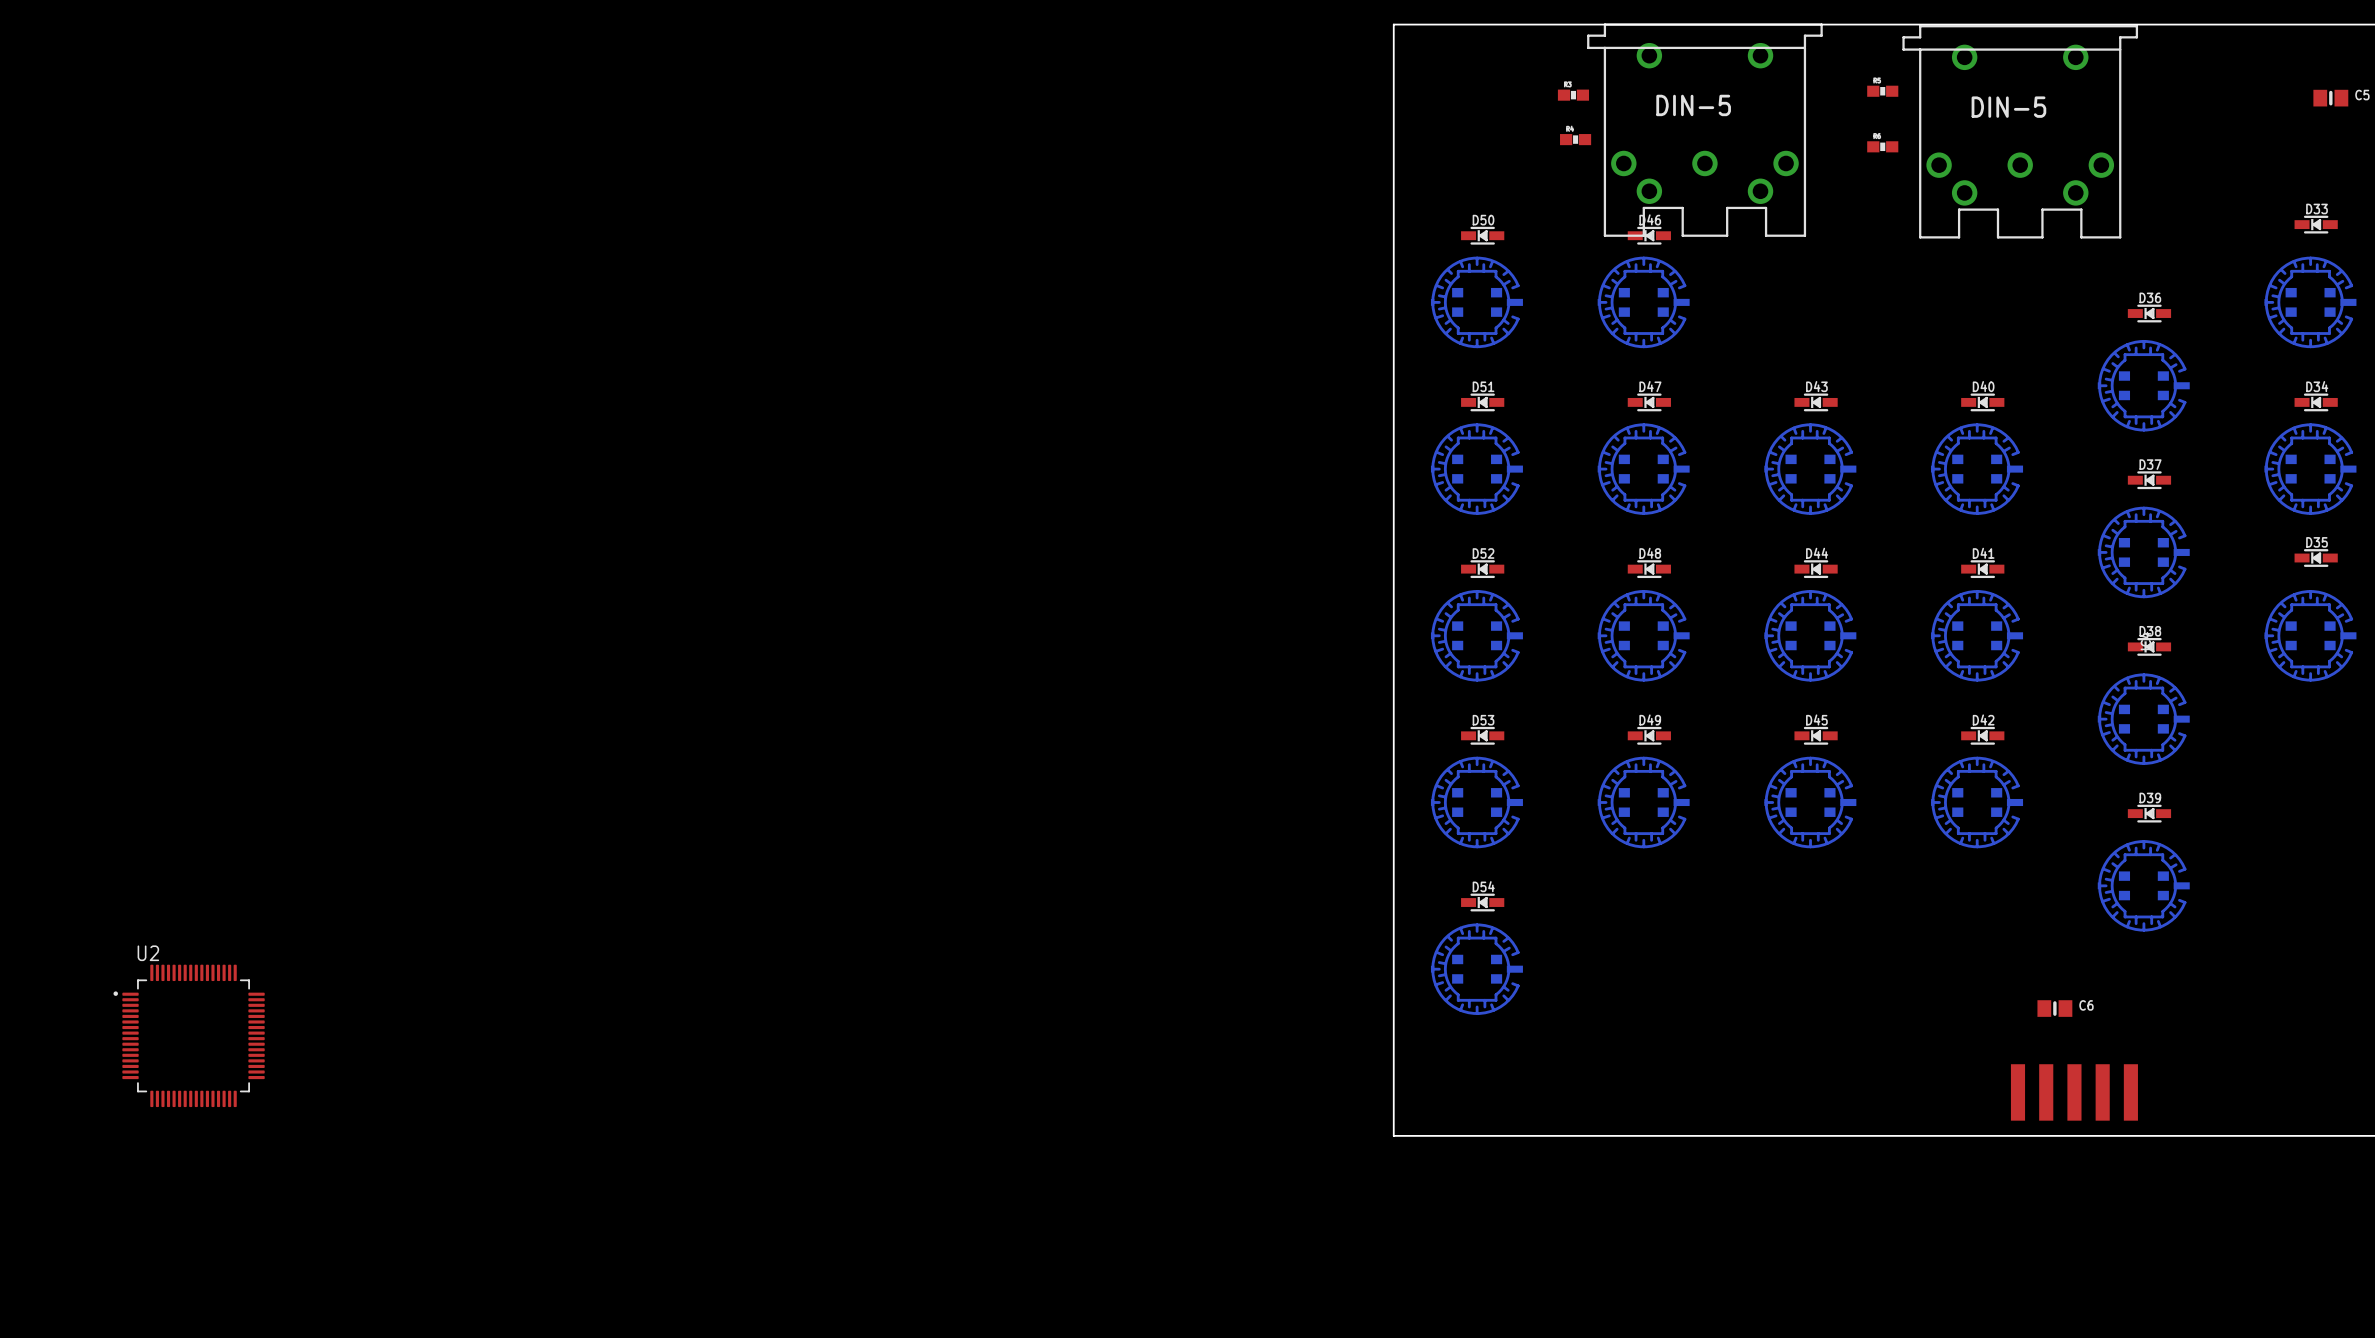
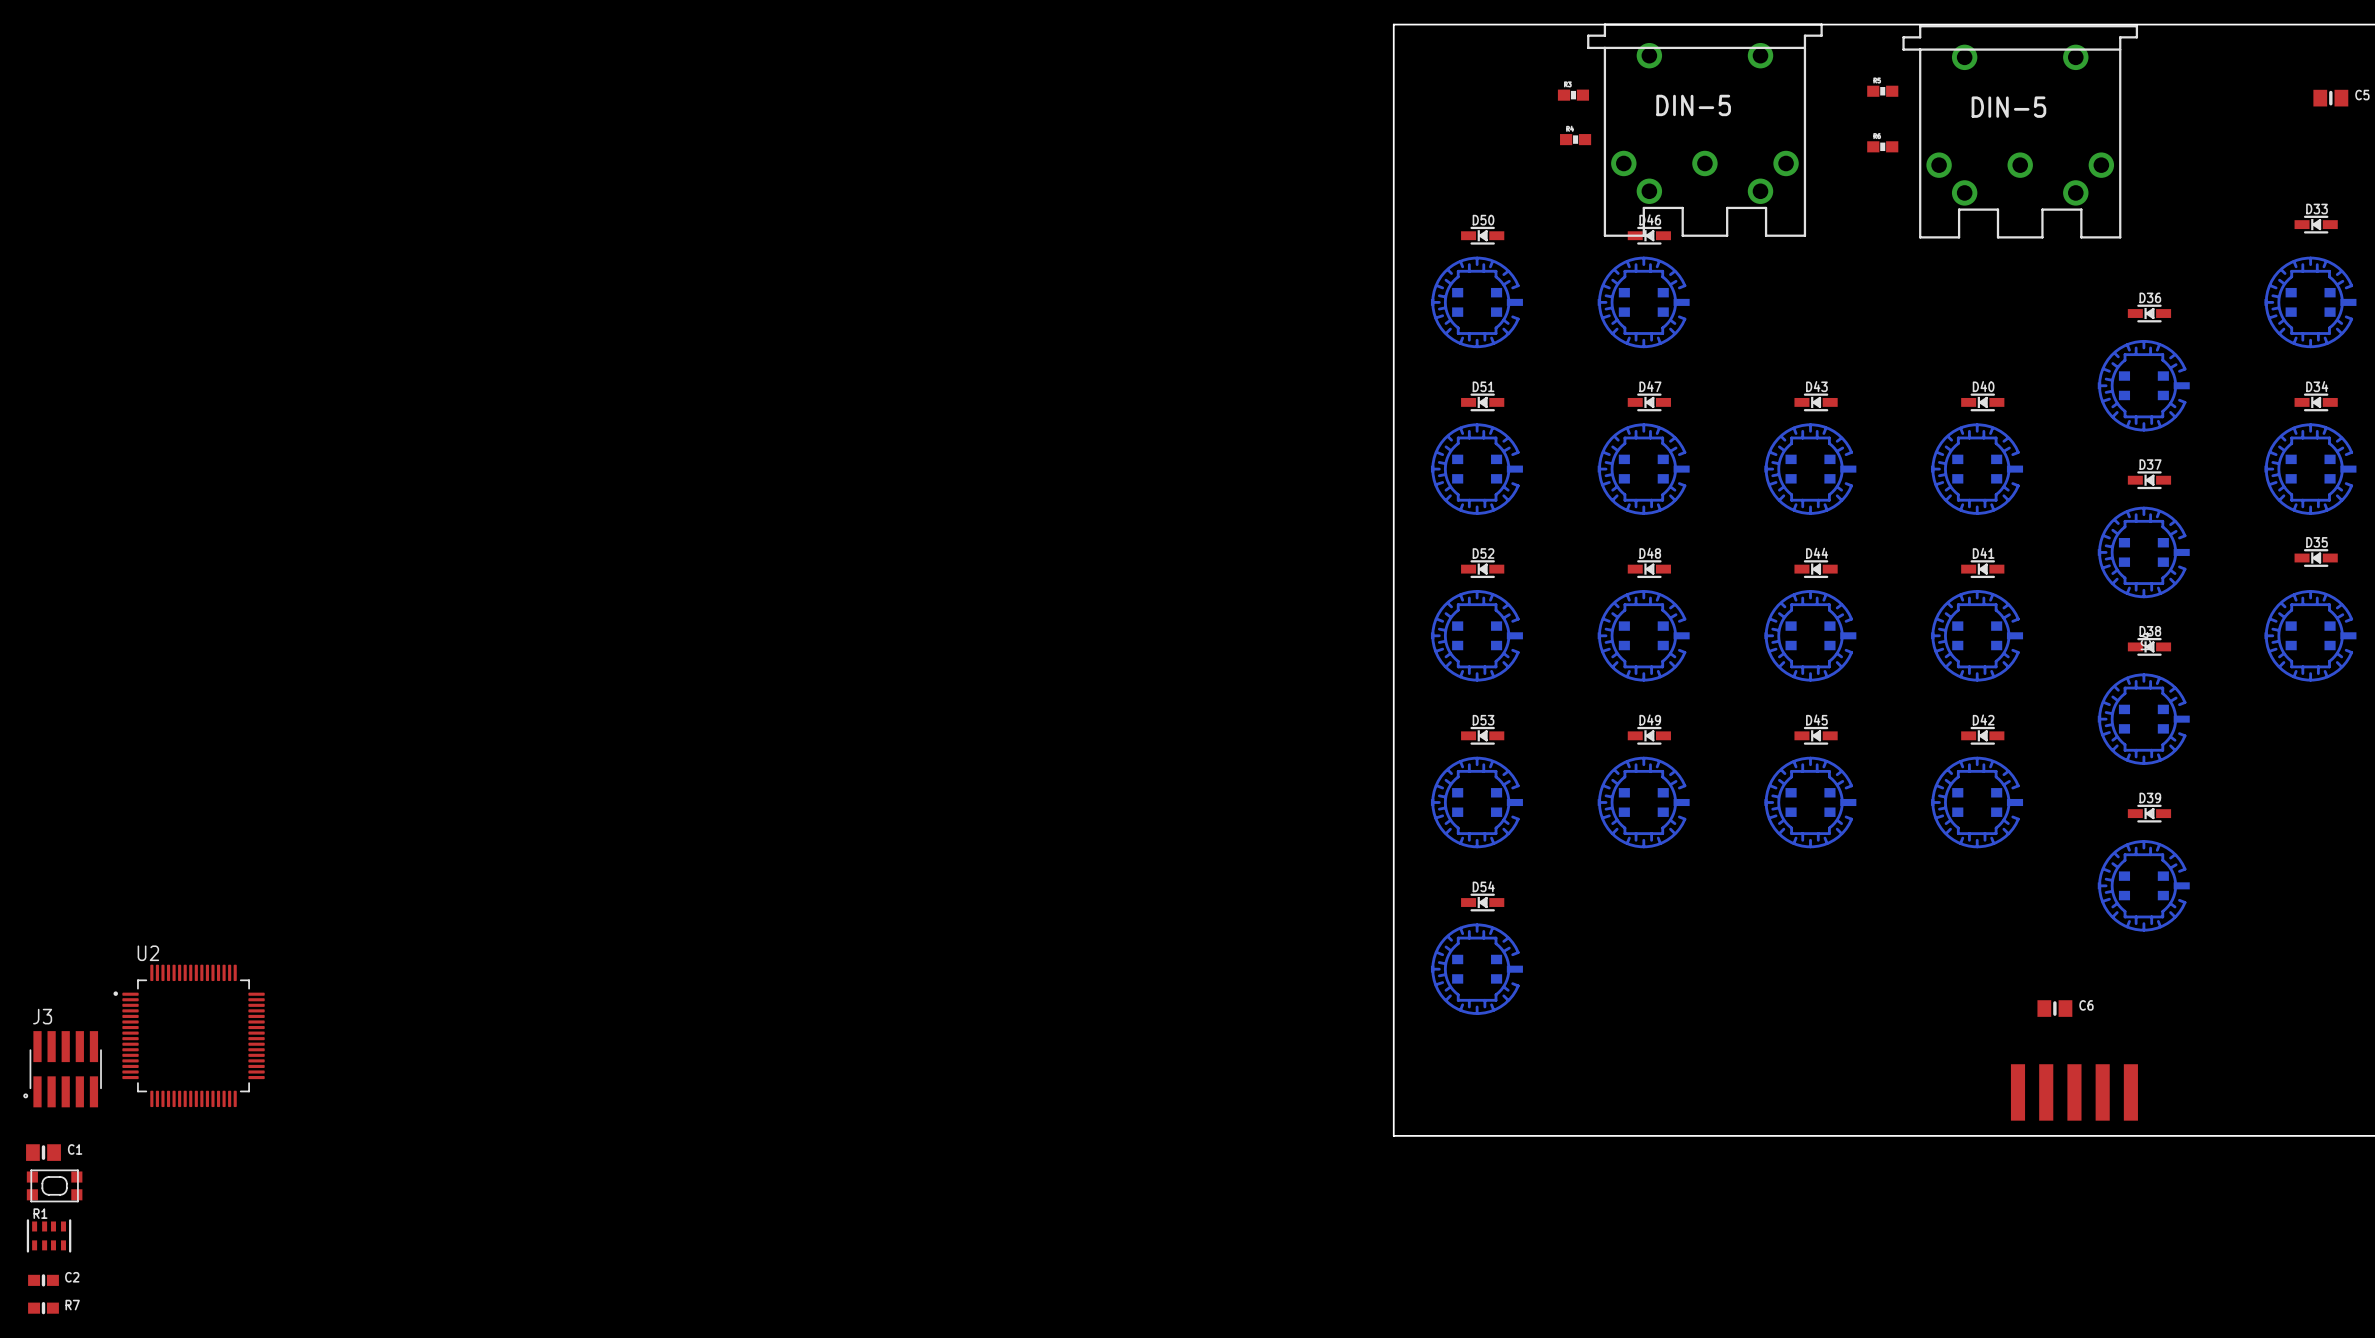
J3: none -> (62, 1069)
C1: none -> (43, 1152)
part: none -> (54, 1185)
R1: none -> (49, 1235)
C2: none -> (43, 1280)
R7: none -> (43, 1308)

